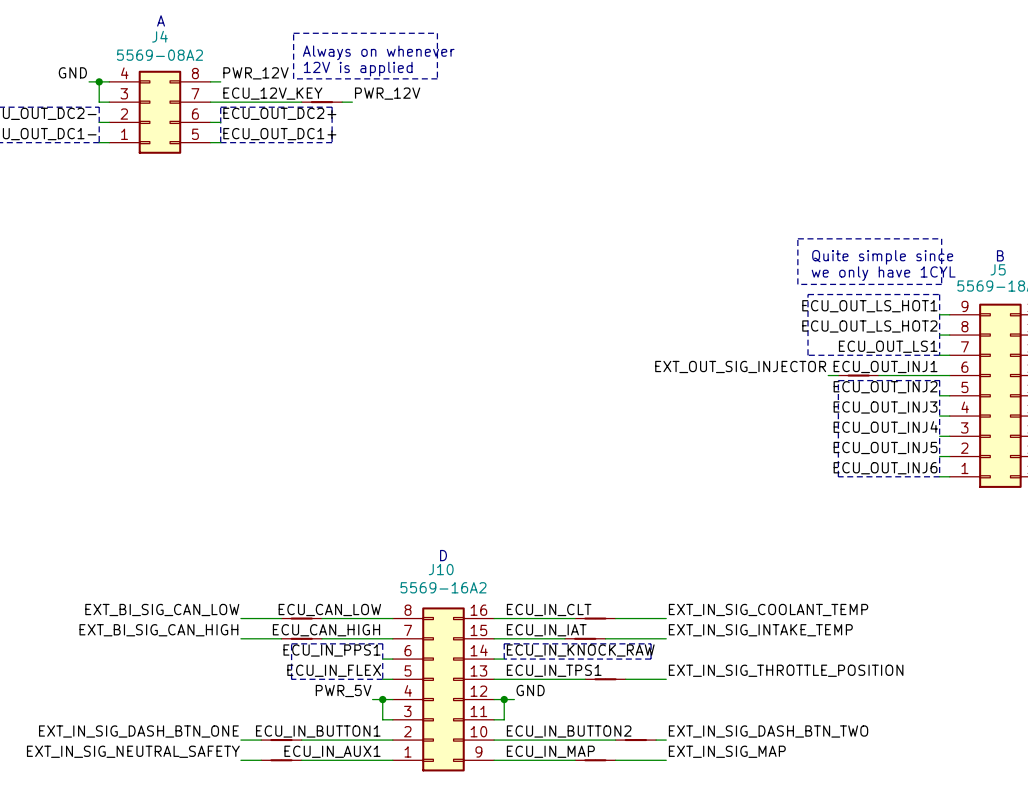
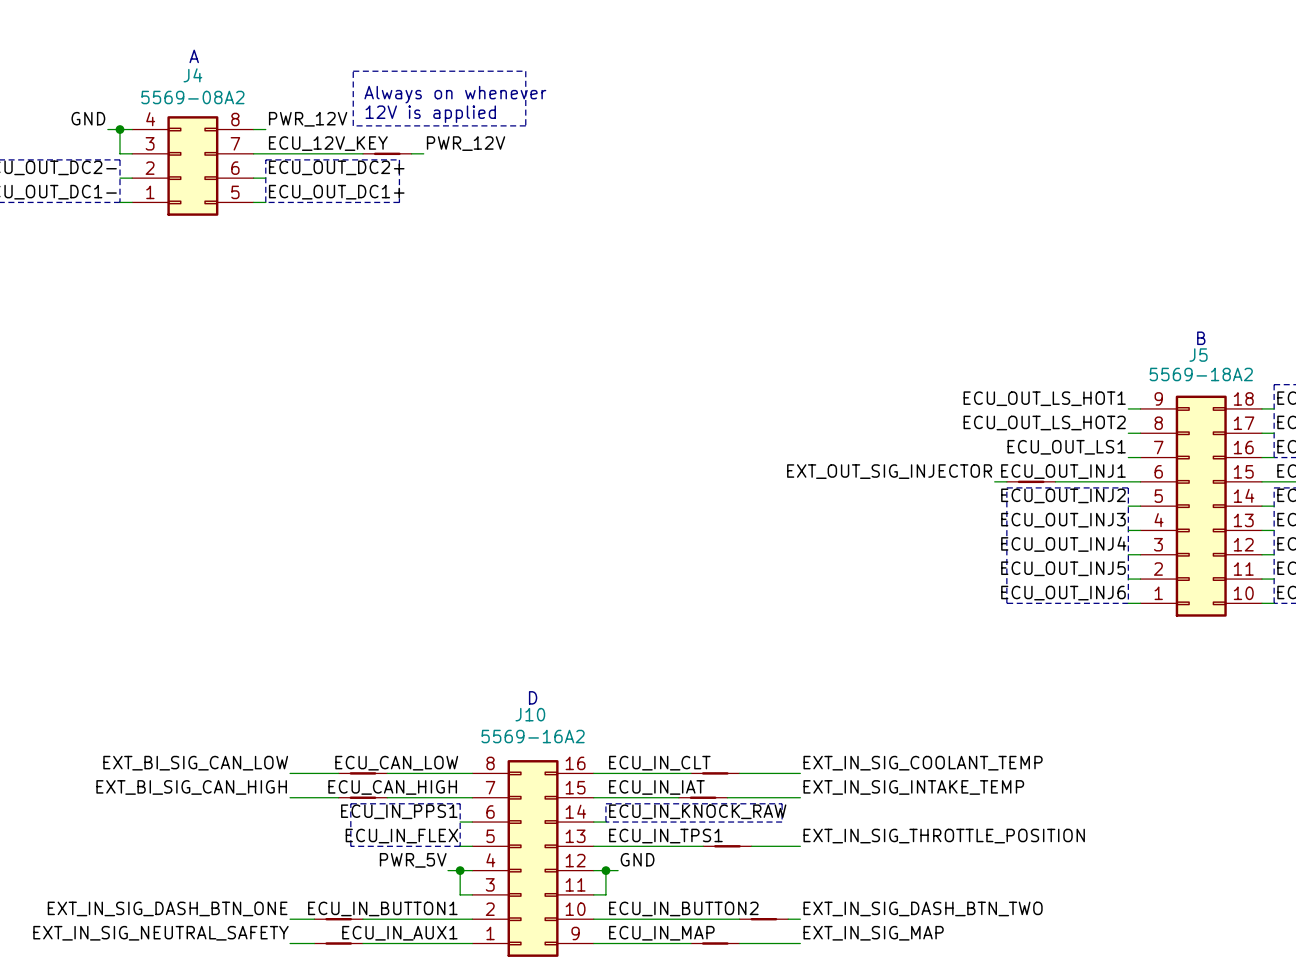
line: (797, 238) (941, 238) (941, 284) (797, 284) (797, 238) -> none
text: Quite simple since (882, 257) -> none
text: we only have 1CYL (883, 273) -> none
line: (808, 294) (939, 294) (939, 355) (808, 355) (808, 294) -> none

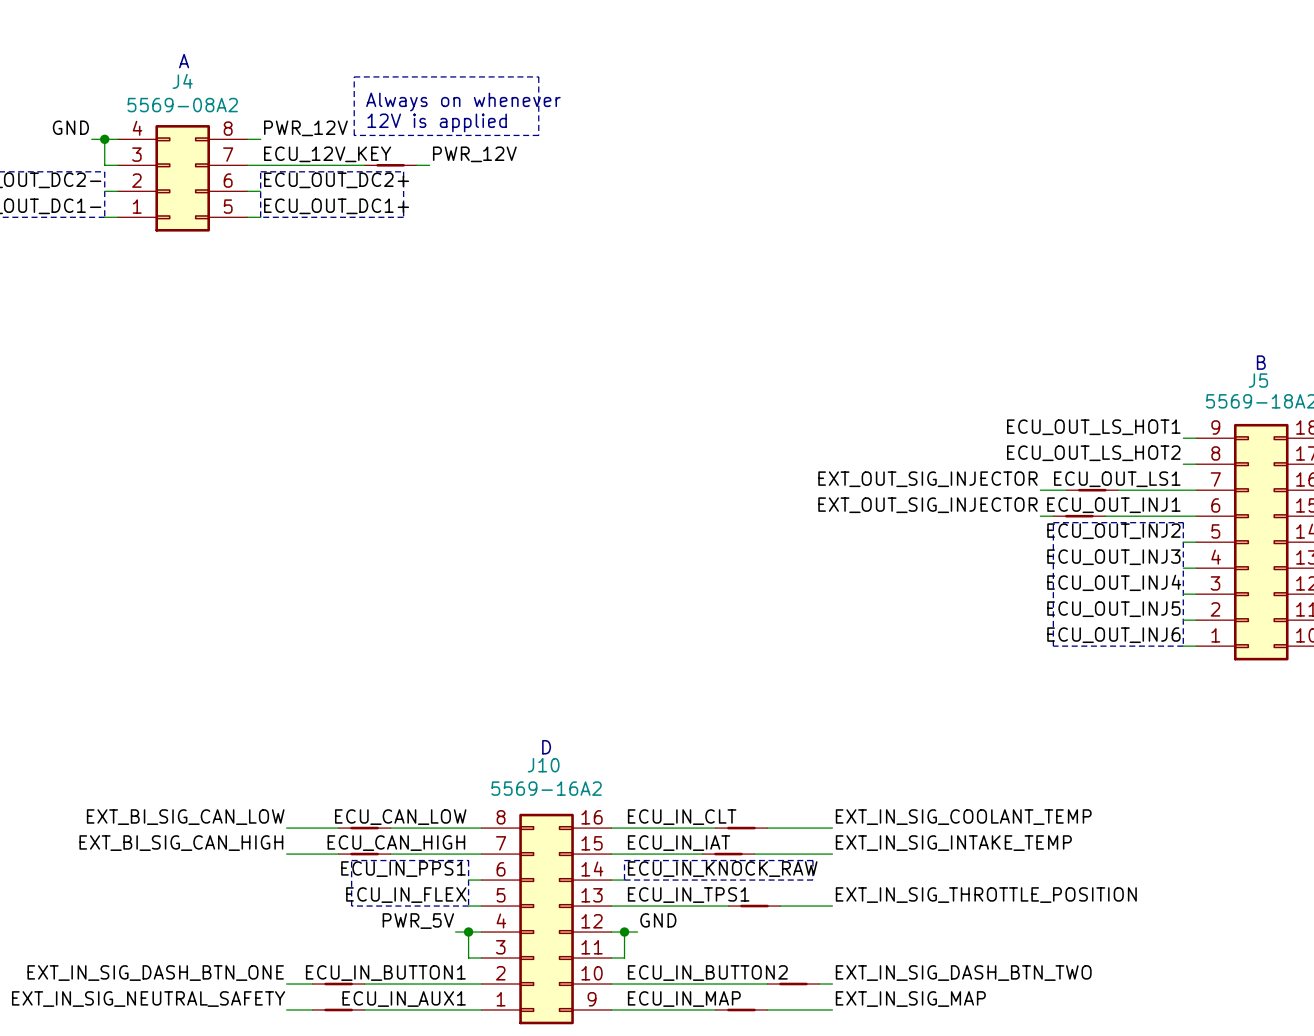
label: none -> EXT_OUT_SIG_INJECTOR (927, 479)
wire: none -> (1040, 490) (1066, 490)
part: none -> (1092, 490)
wire: none -> (1118, 490) (1183, 490)

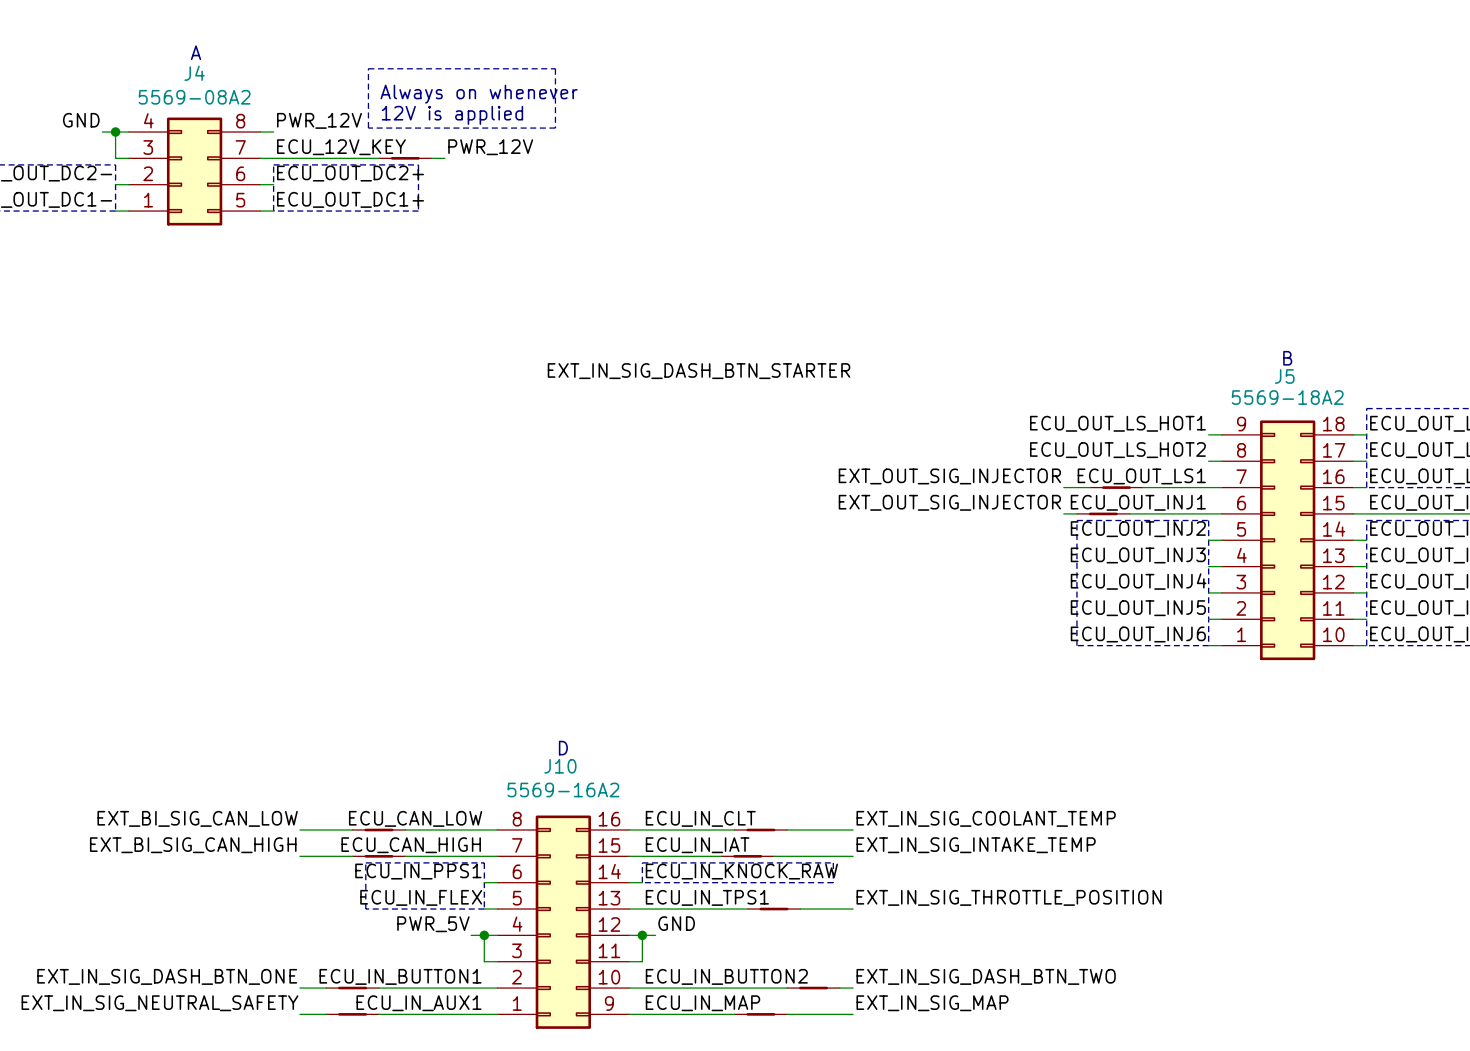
label: none -> EXT_IN_SIG_DASH_BTN_STARTER (699, 371)

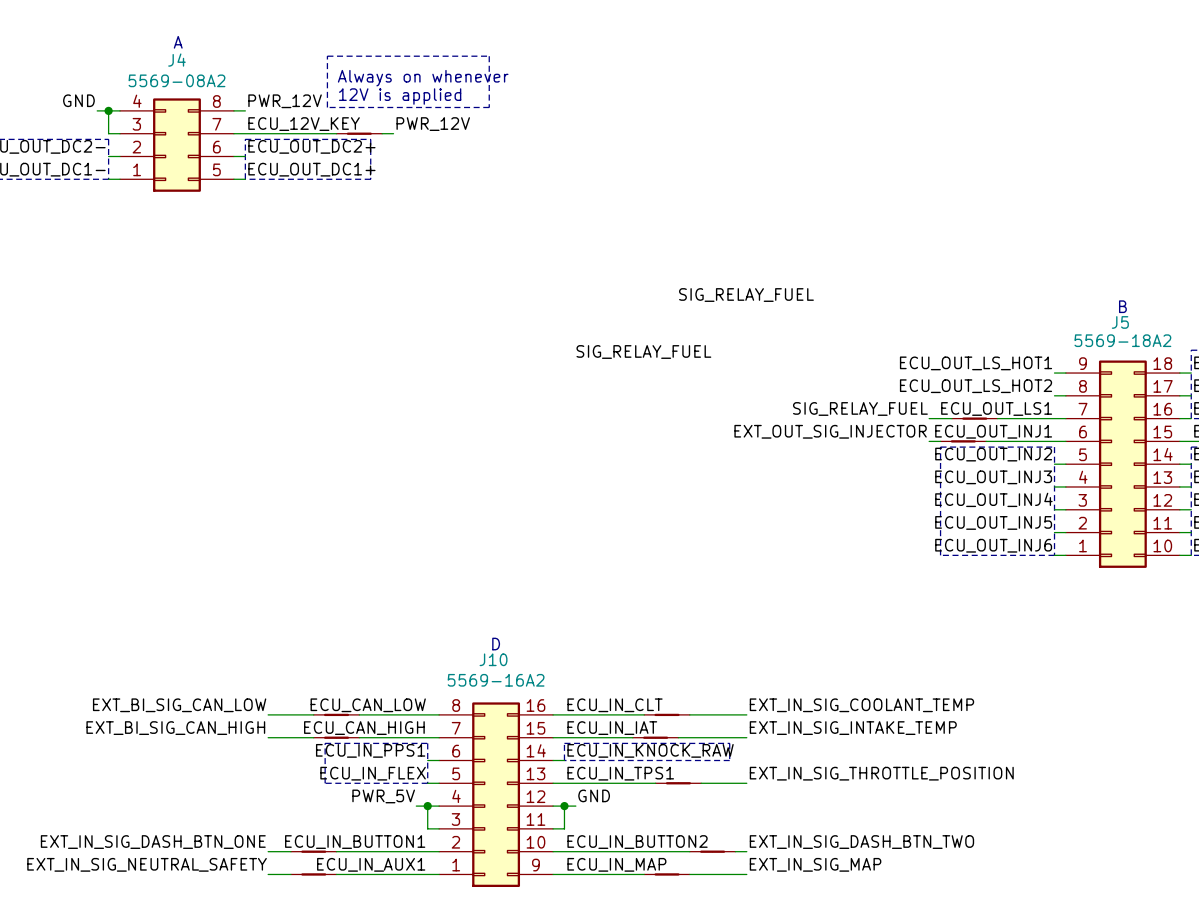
label: none -> SIG_RELAY_FUEL (746, 295)
label: EXT_IN_SIG_DASH_BTN_STARTER (699, 371) -> none
label: none -> SIG_RELAY_FUEL (643, 352)
label: EXT_OUT_SIG_INJECTOR (949, 476) -> SIG_RELAY_FUEL (860, 408)

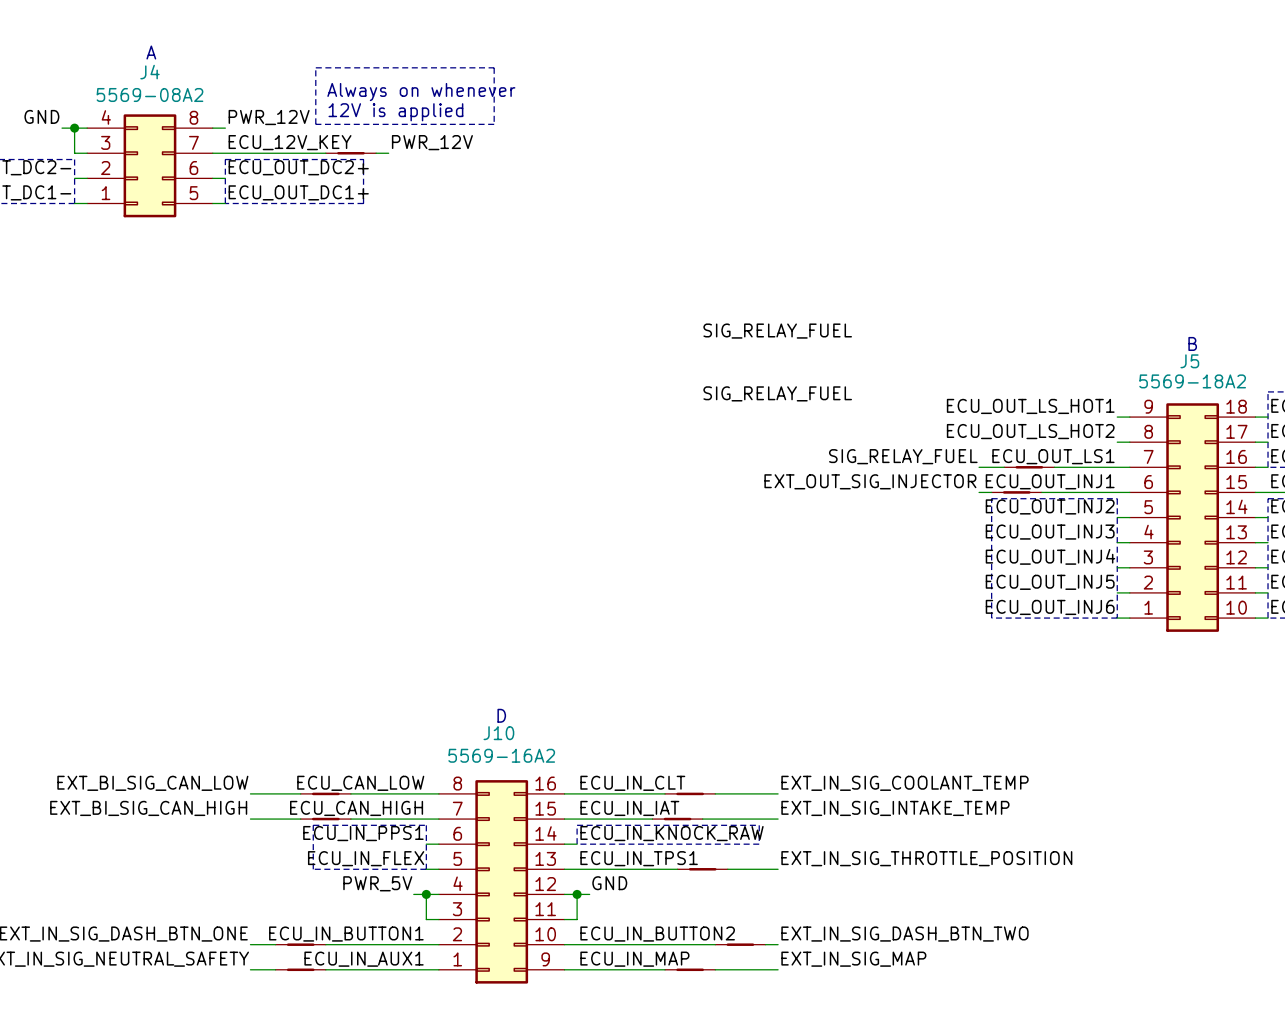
label position: SIG_RELAY_FUEL (643, 352) -> SIG_RELAY_FUEL (777, 393)

